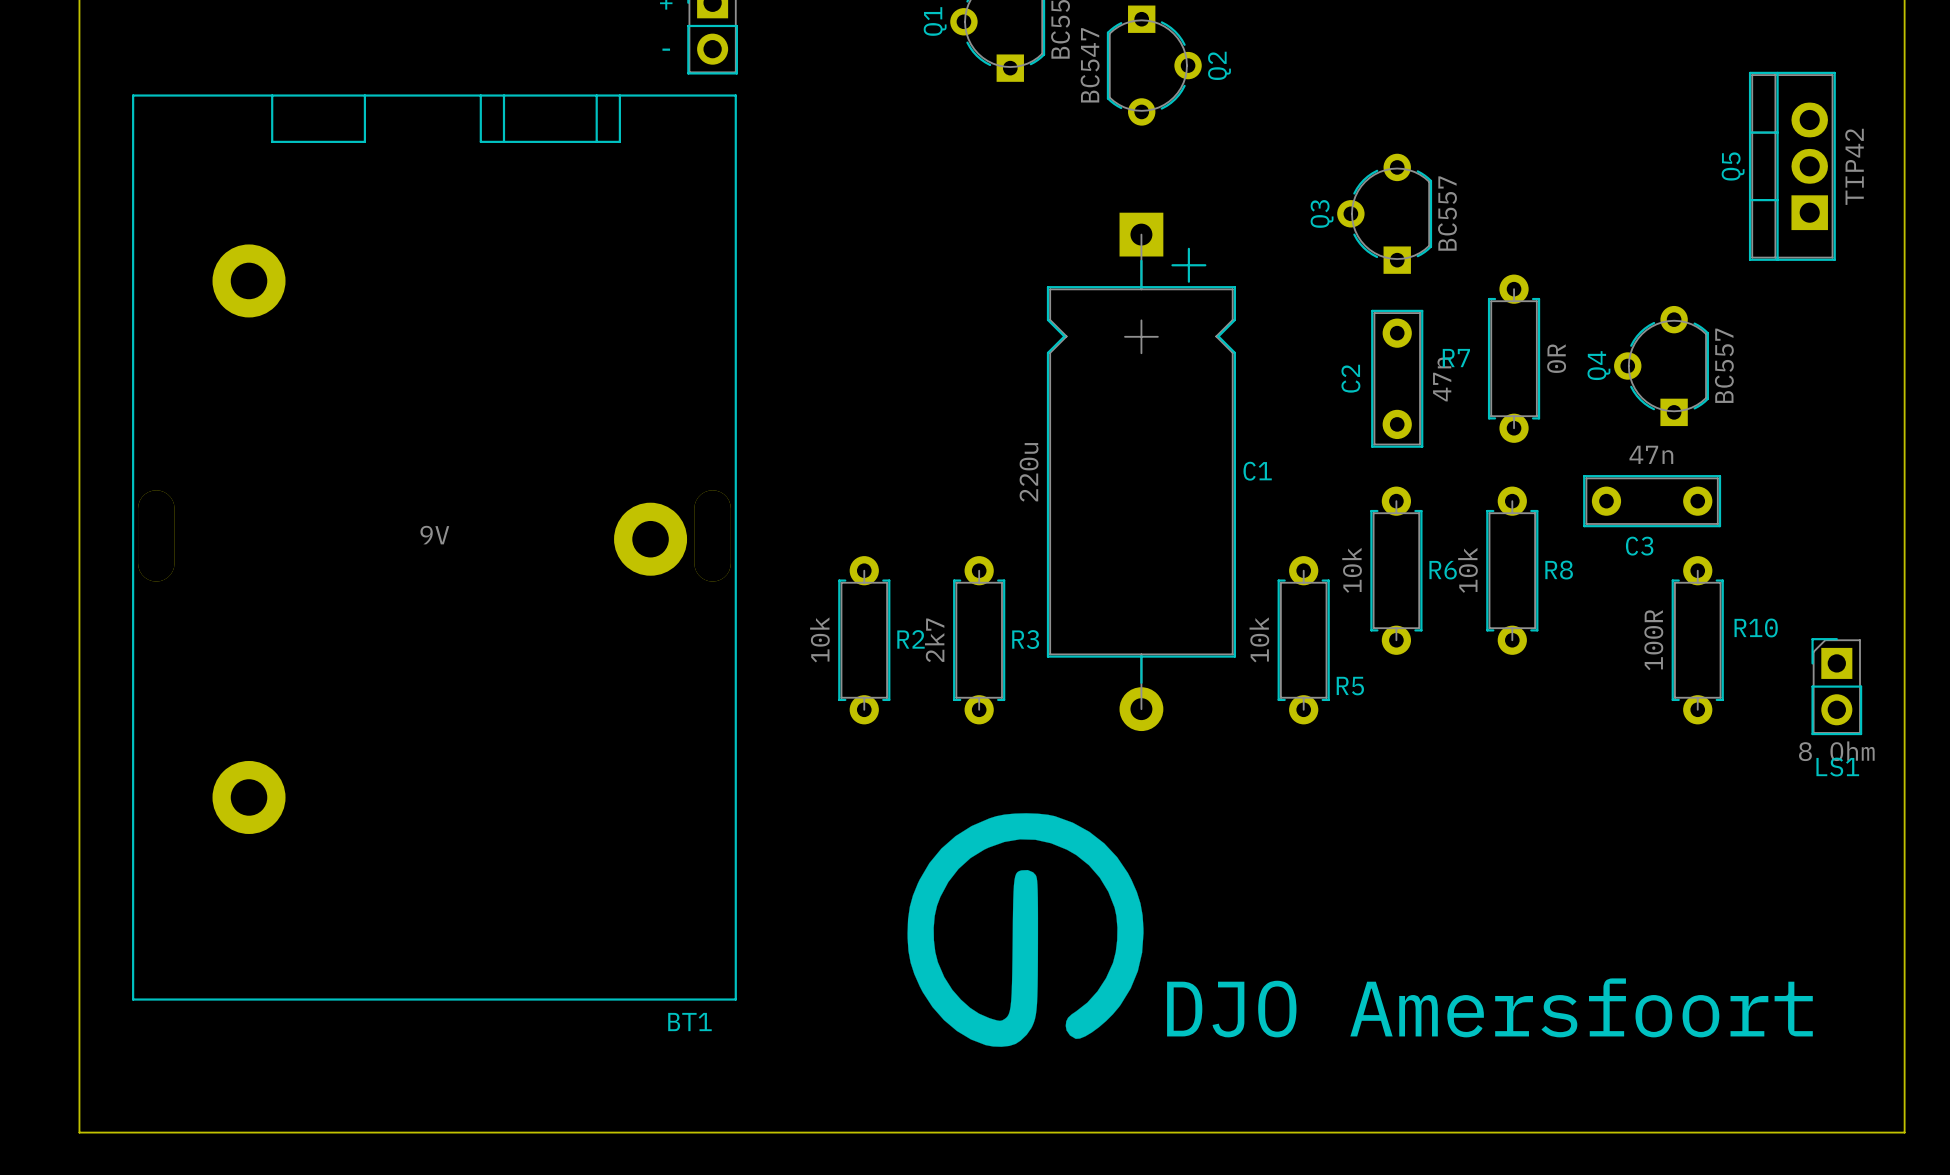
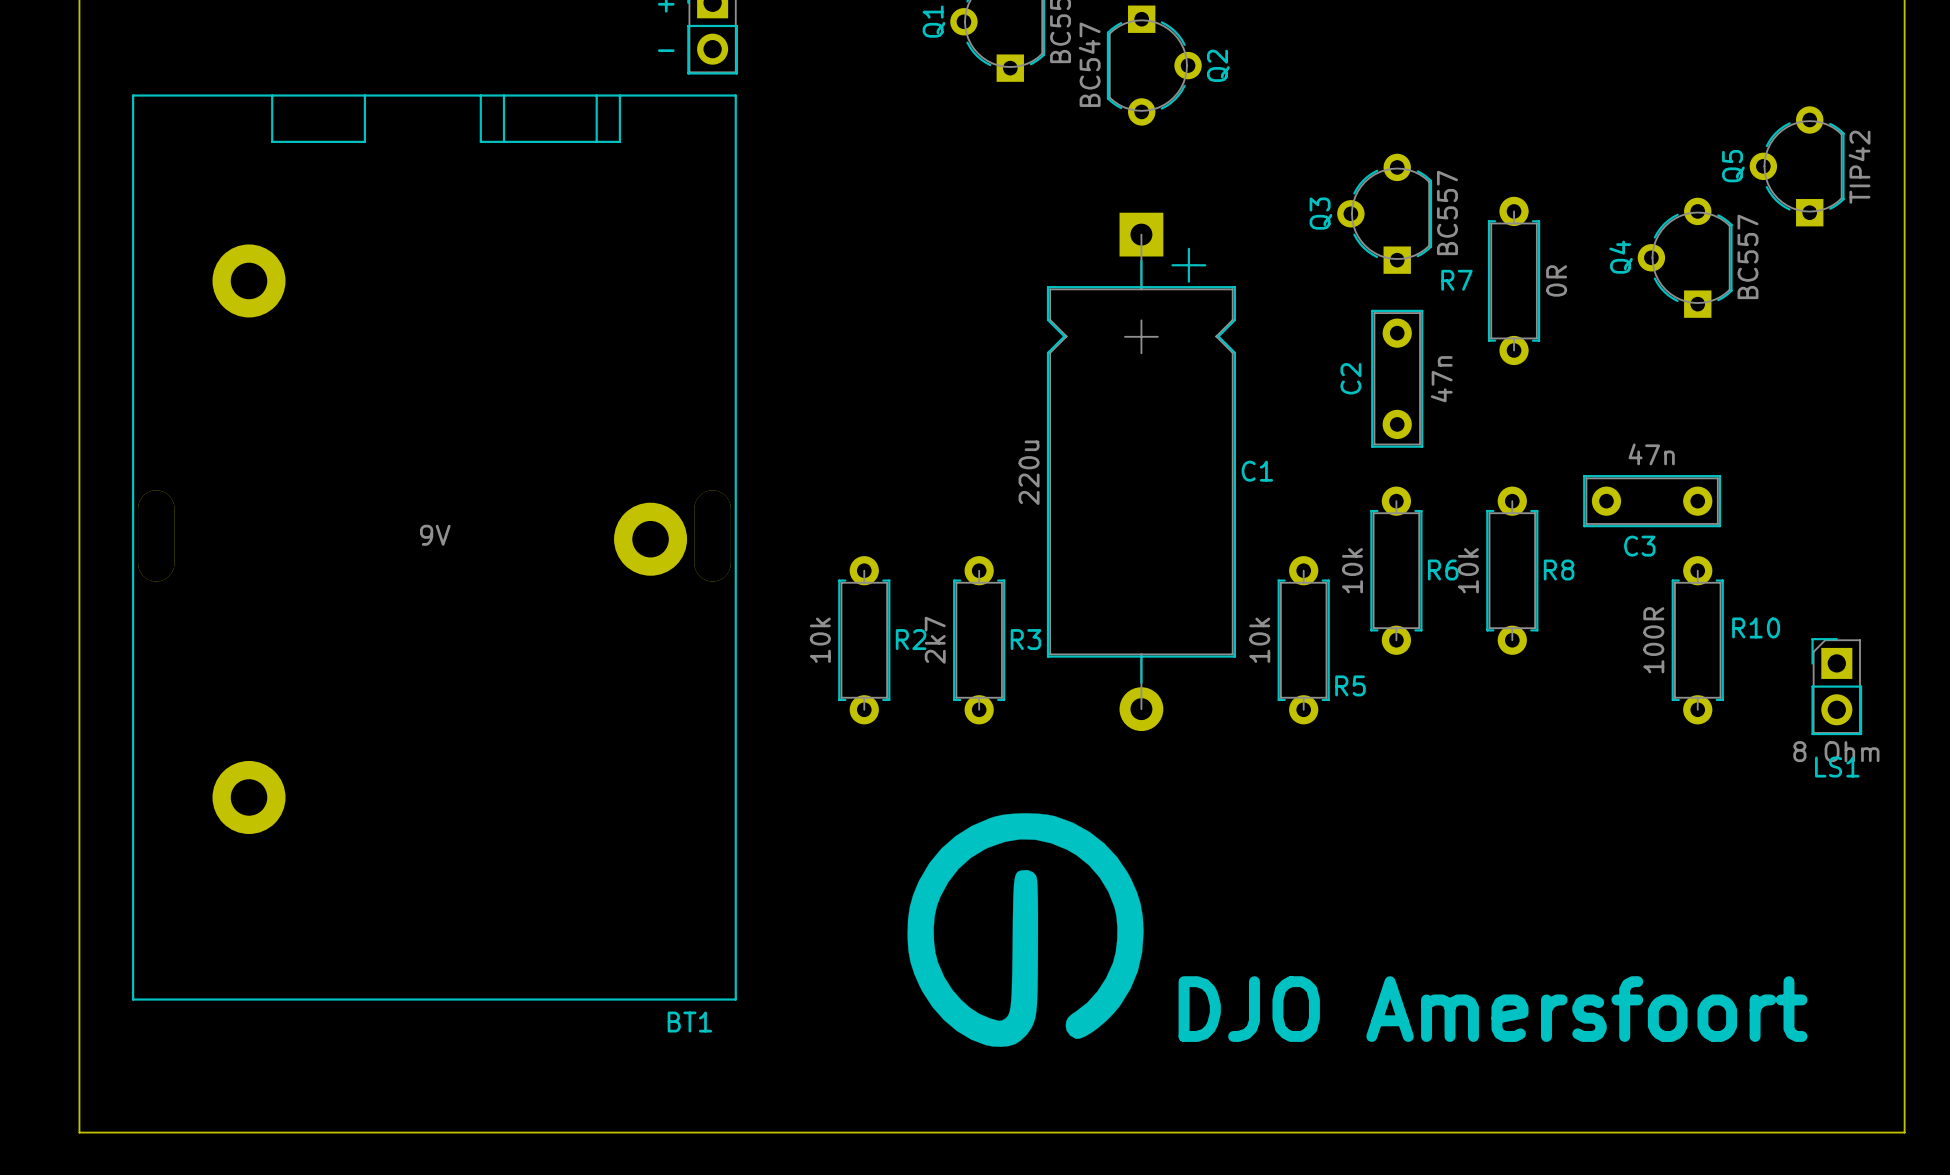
Q5 footprint: [1748, 71, 1836, 261] -> [1749, 106, 1845, 227]
R7 position: (1514, 358) -> (1514, 280)
Q4 position: (1661, 366) -> (1685, 257)

